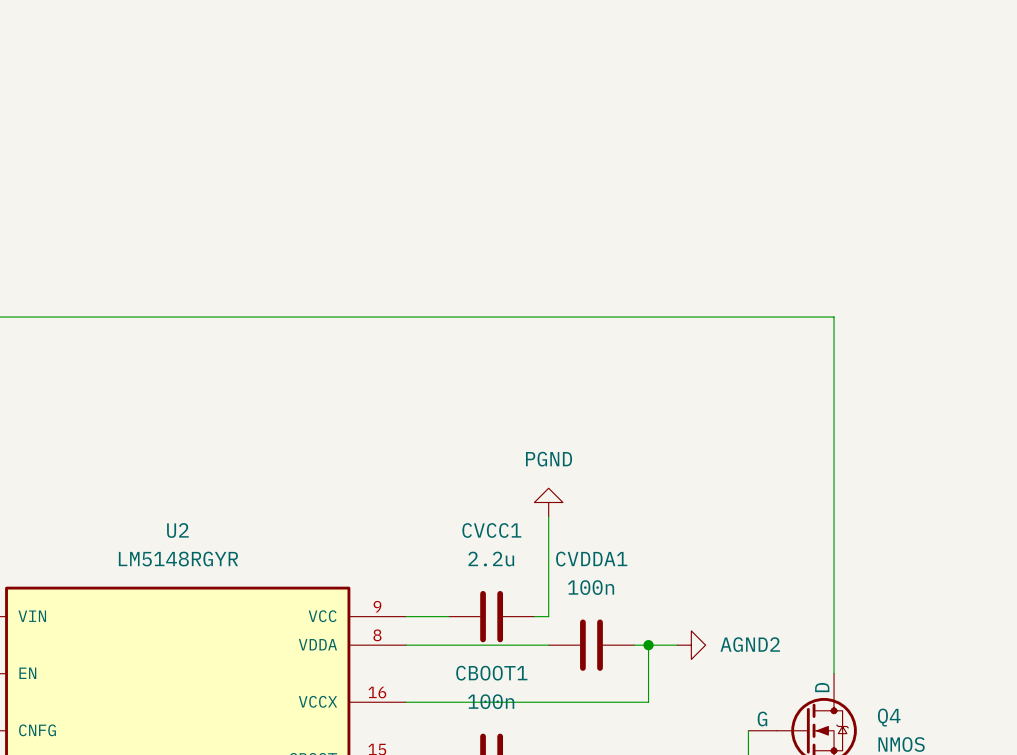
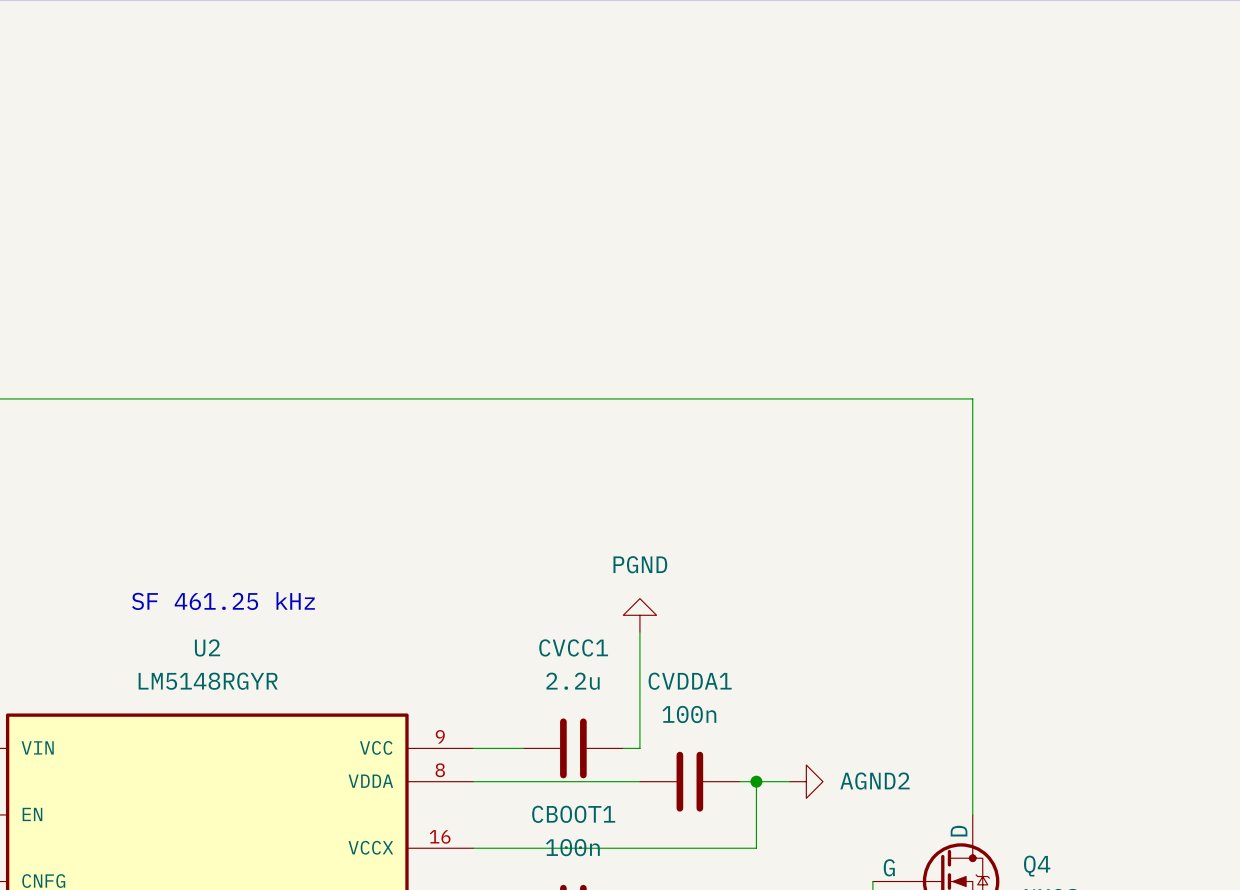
text: none -> SF 461.25 kHz (223, 601)

